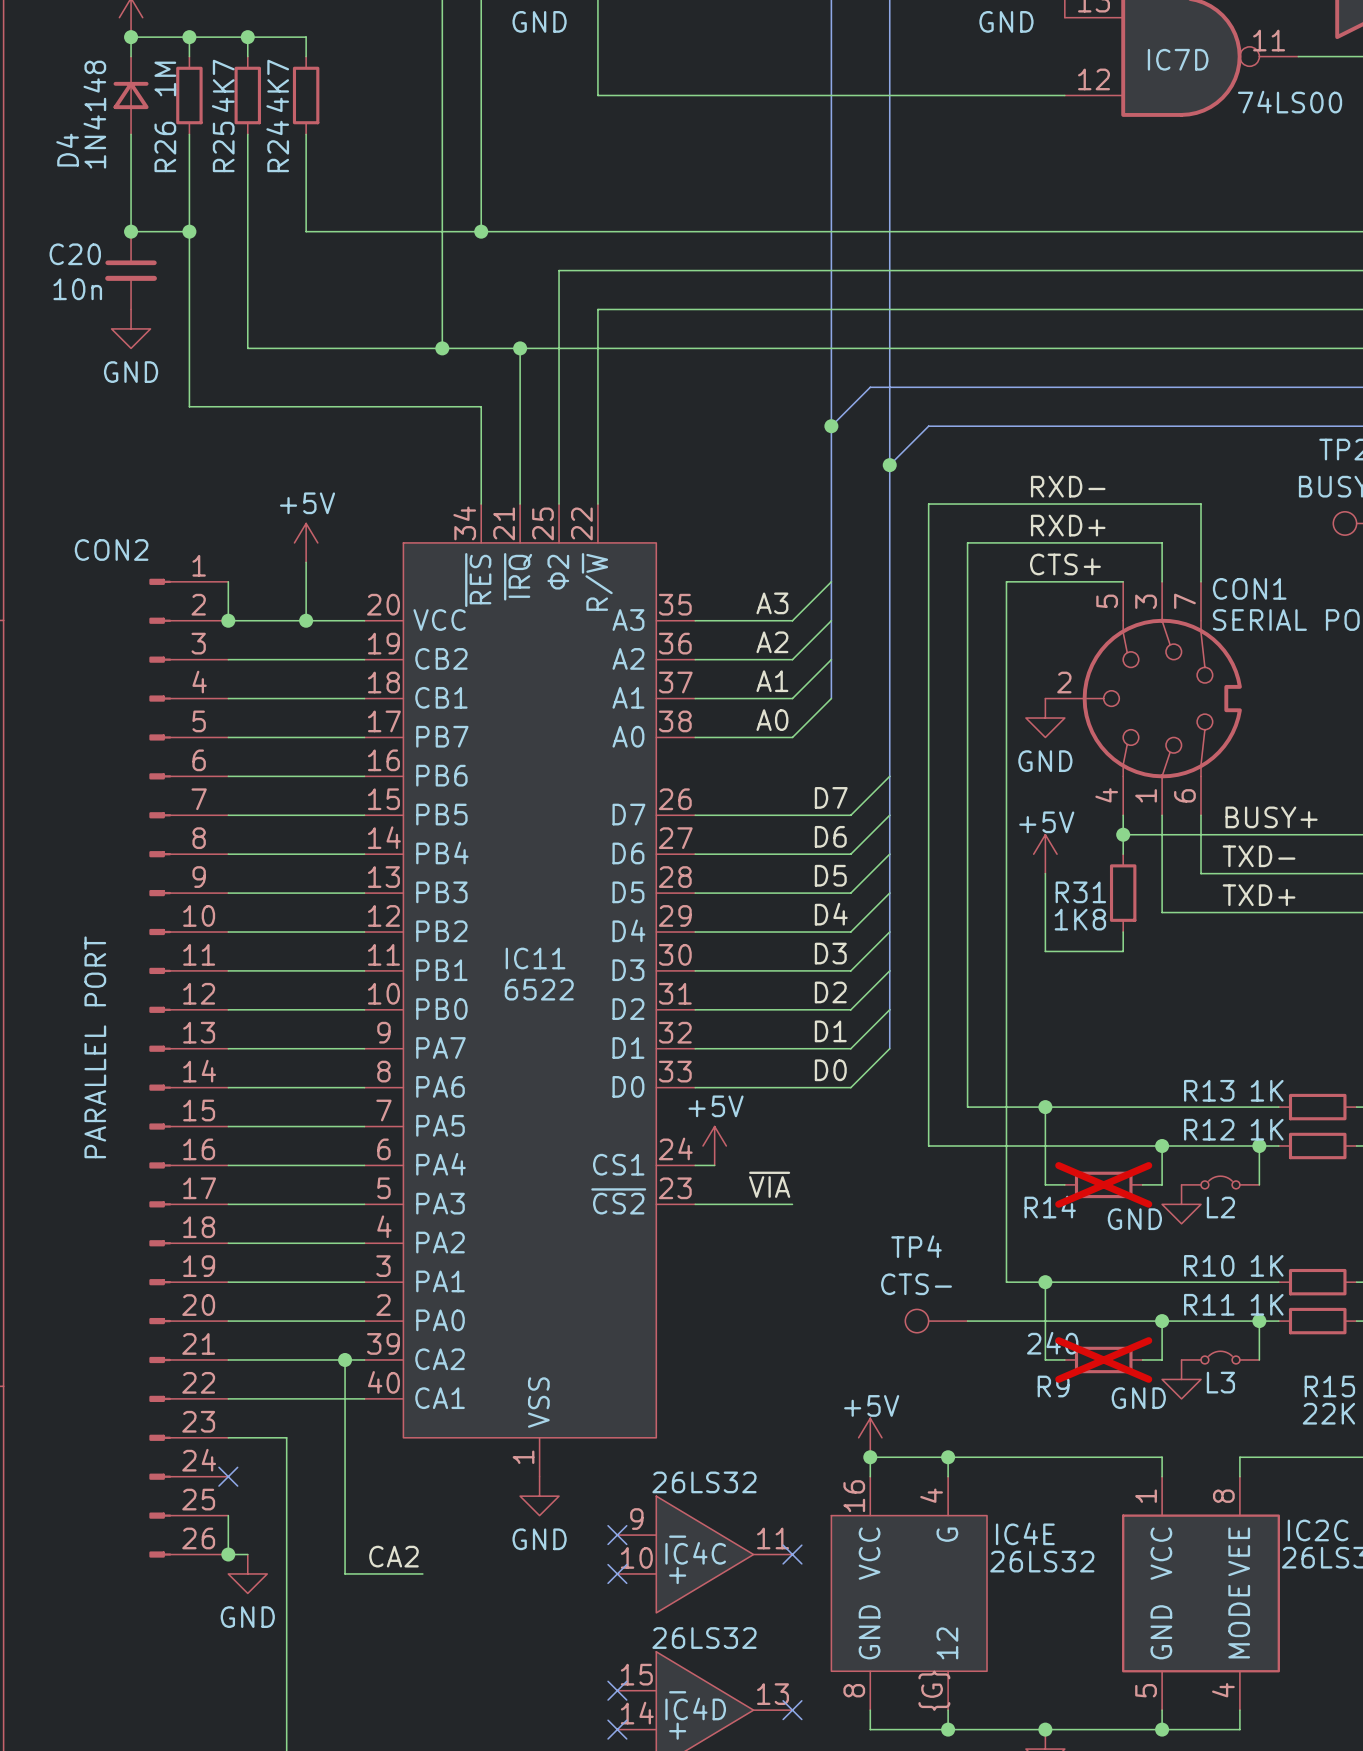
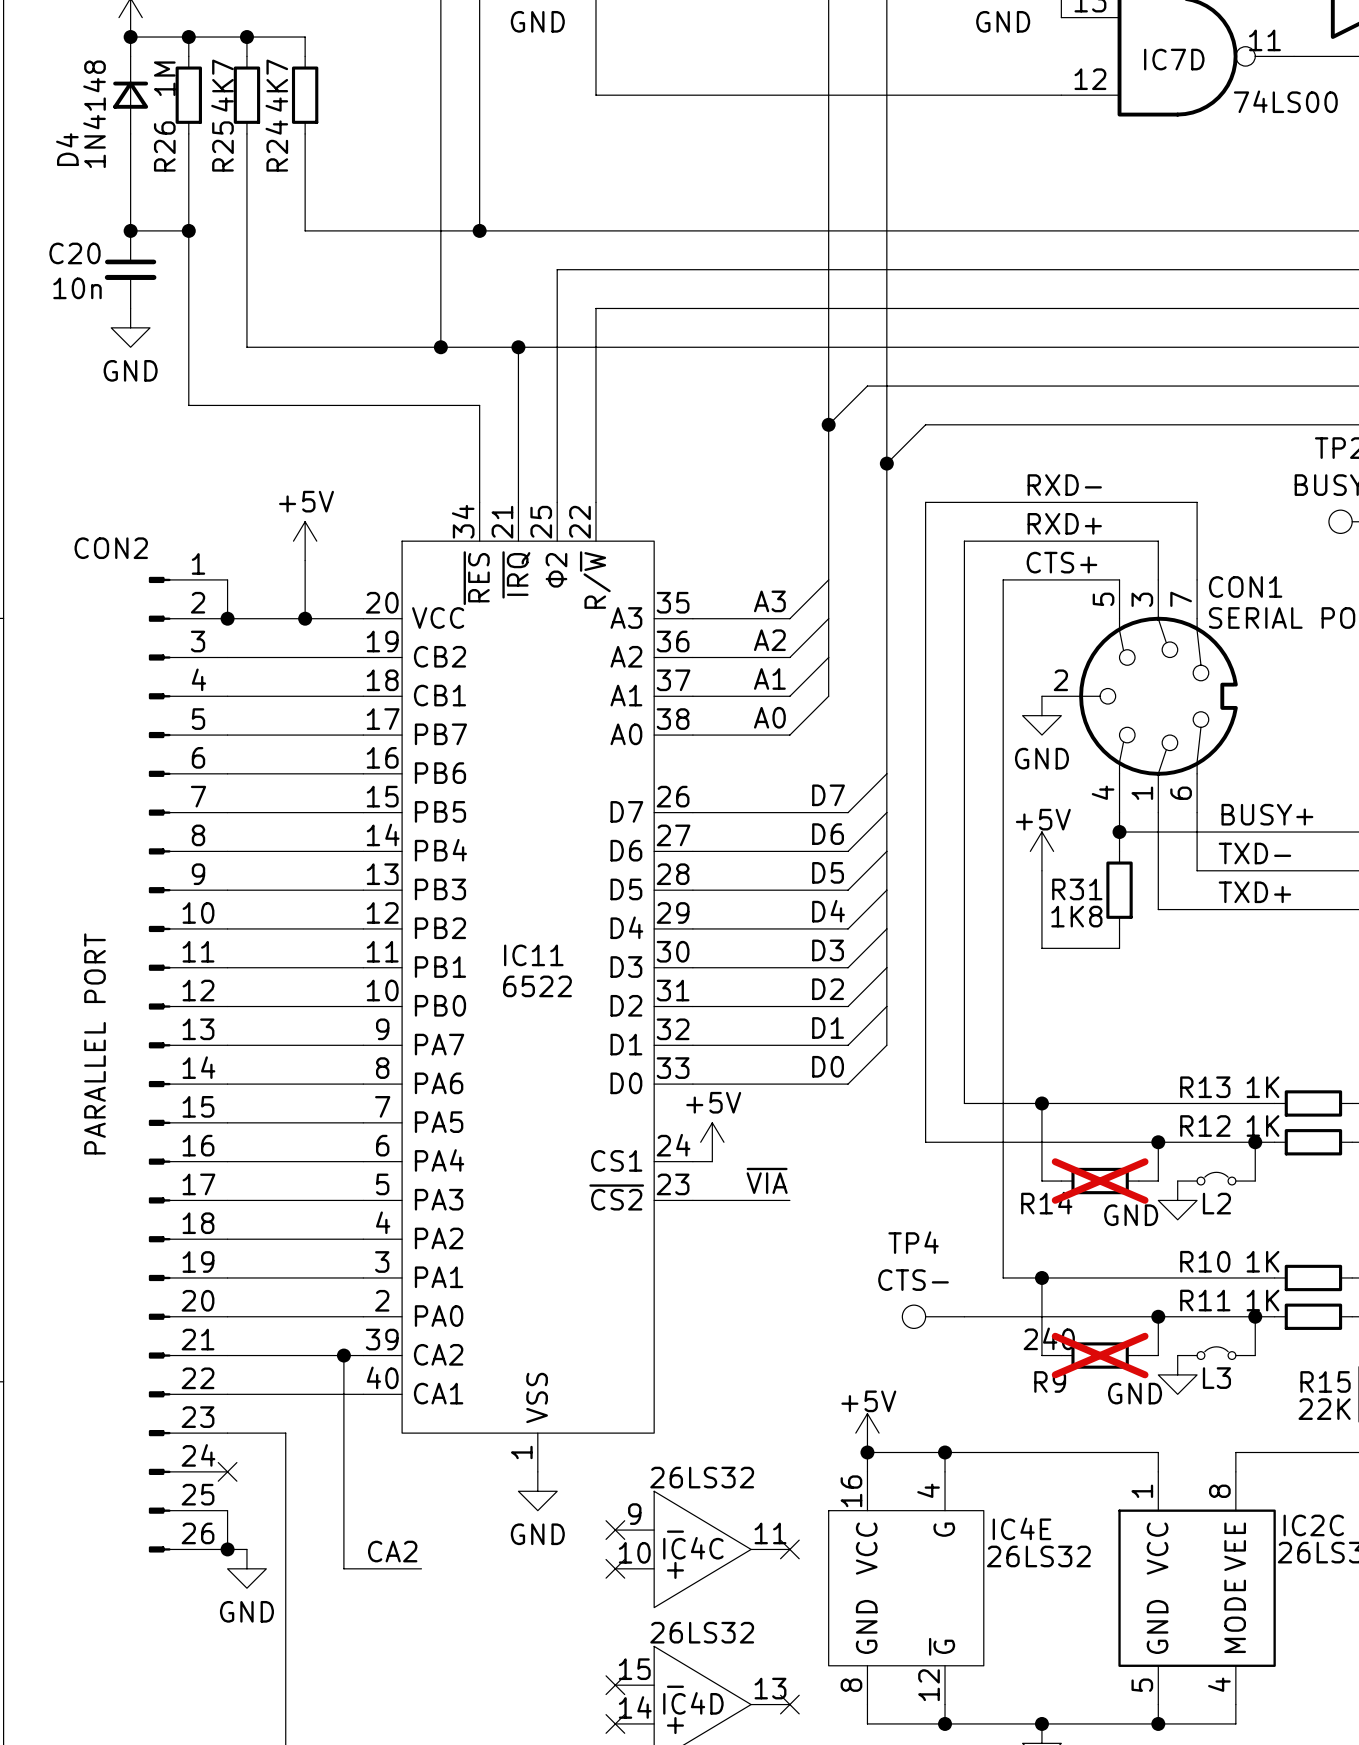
IC4E pin name: 12 (947, 1643) -> ~{G} (942, 1646)
IC4E pin number: {G} (934, 1690) -> 12 (929, 1685)

